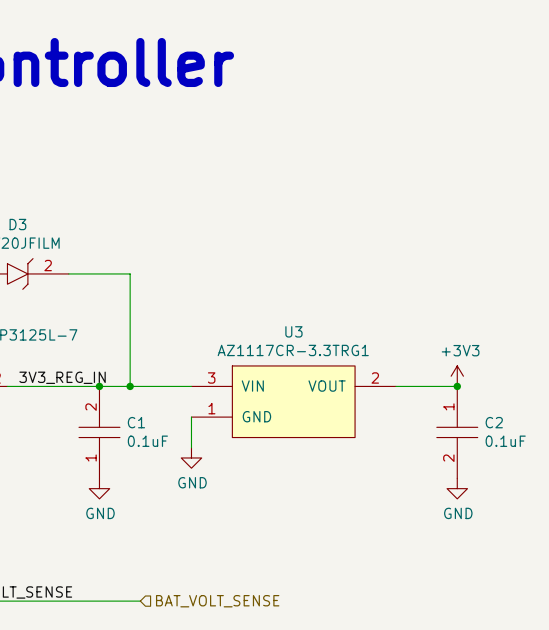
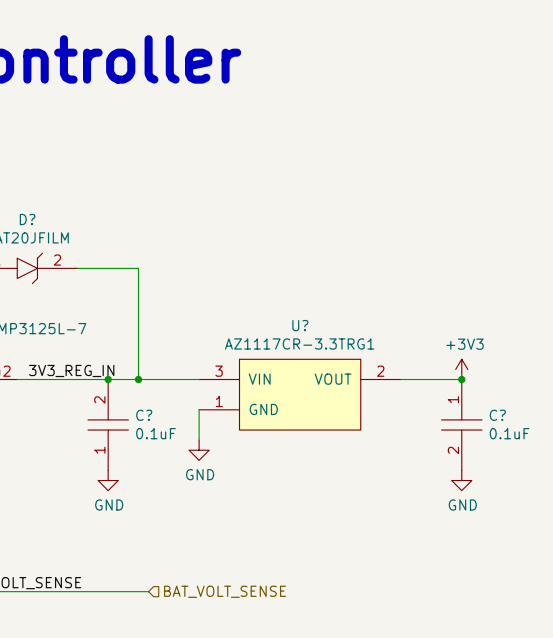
D3 name: D3 (17, 224) -> D? (27, 219)
U3 name: U3 (293, 331) -> U? (300, 325)
C1 name: C1 (136, 422) -> C? (144, 415)
C2 name: C2 (494, 422) -> C? (497, 415)

